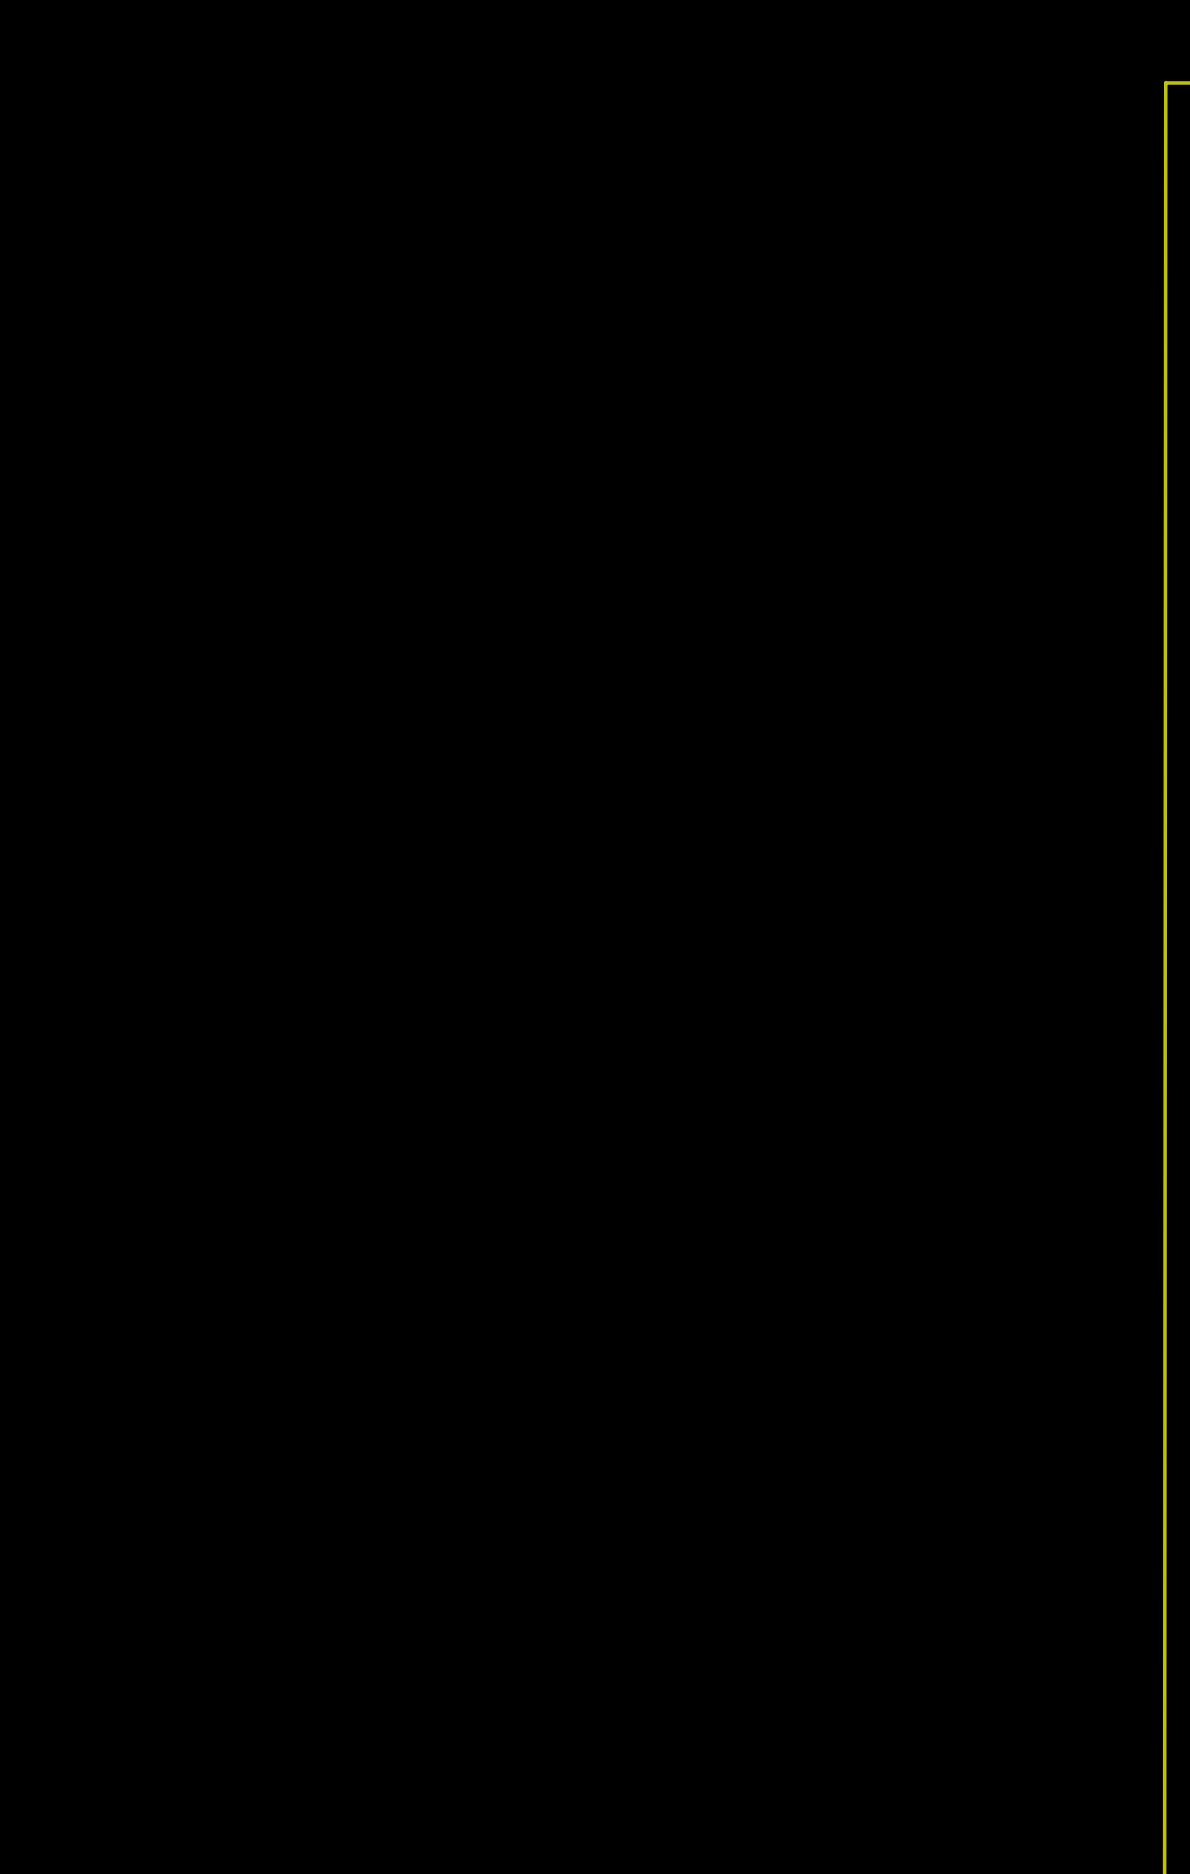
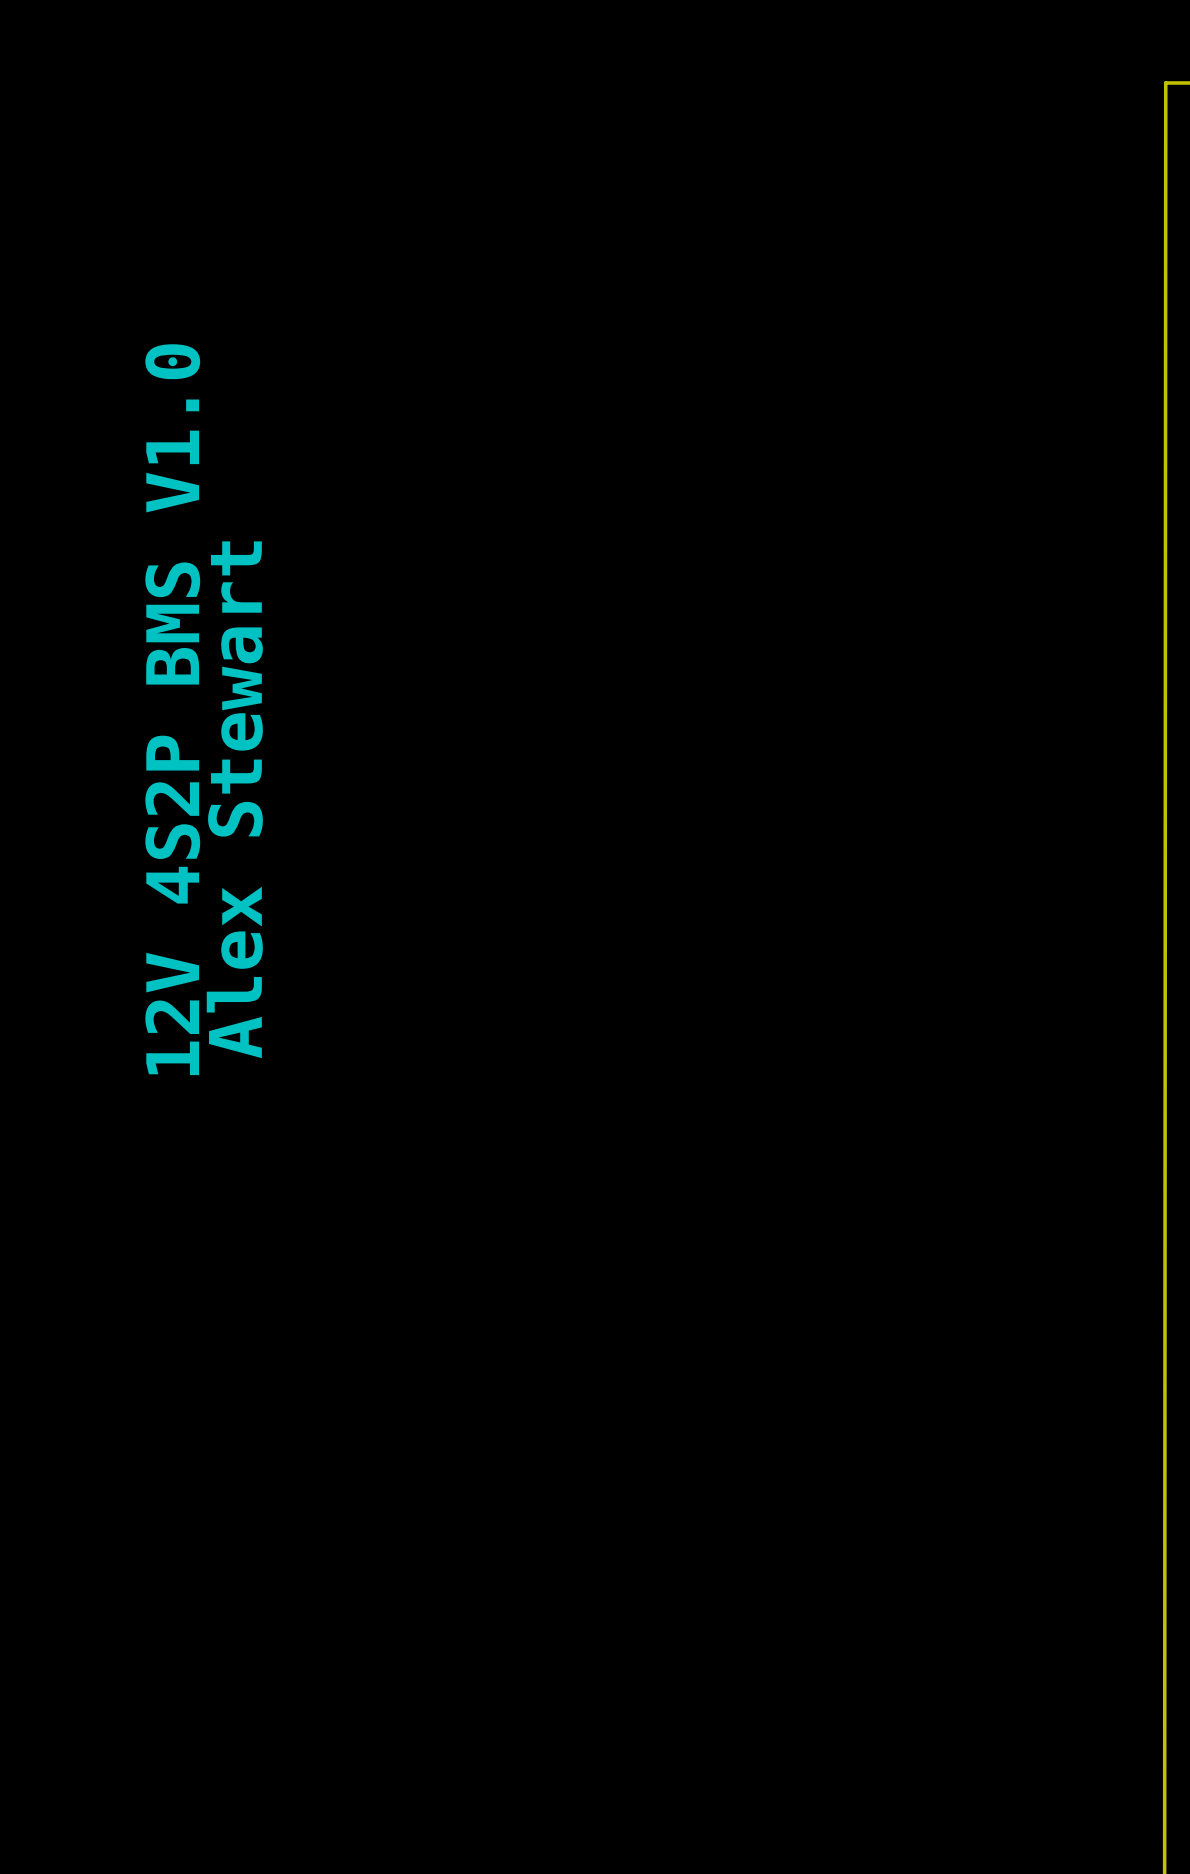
text: none -> 12V 4S2P BMS V1.0 (172, 709)
text: none -> Alex Stewart (234, 799)

